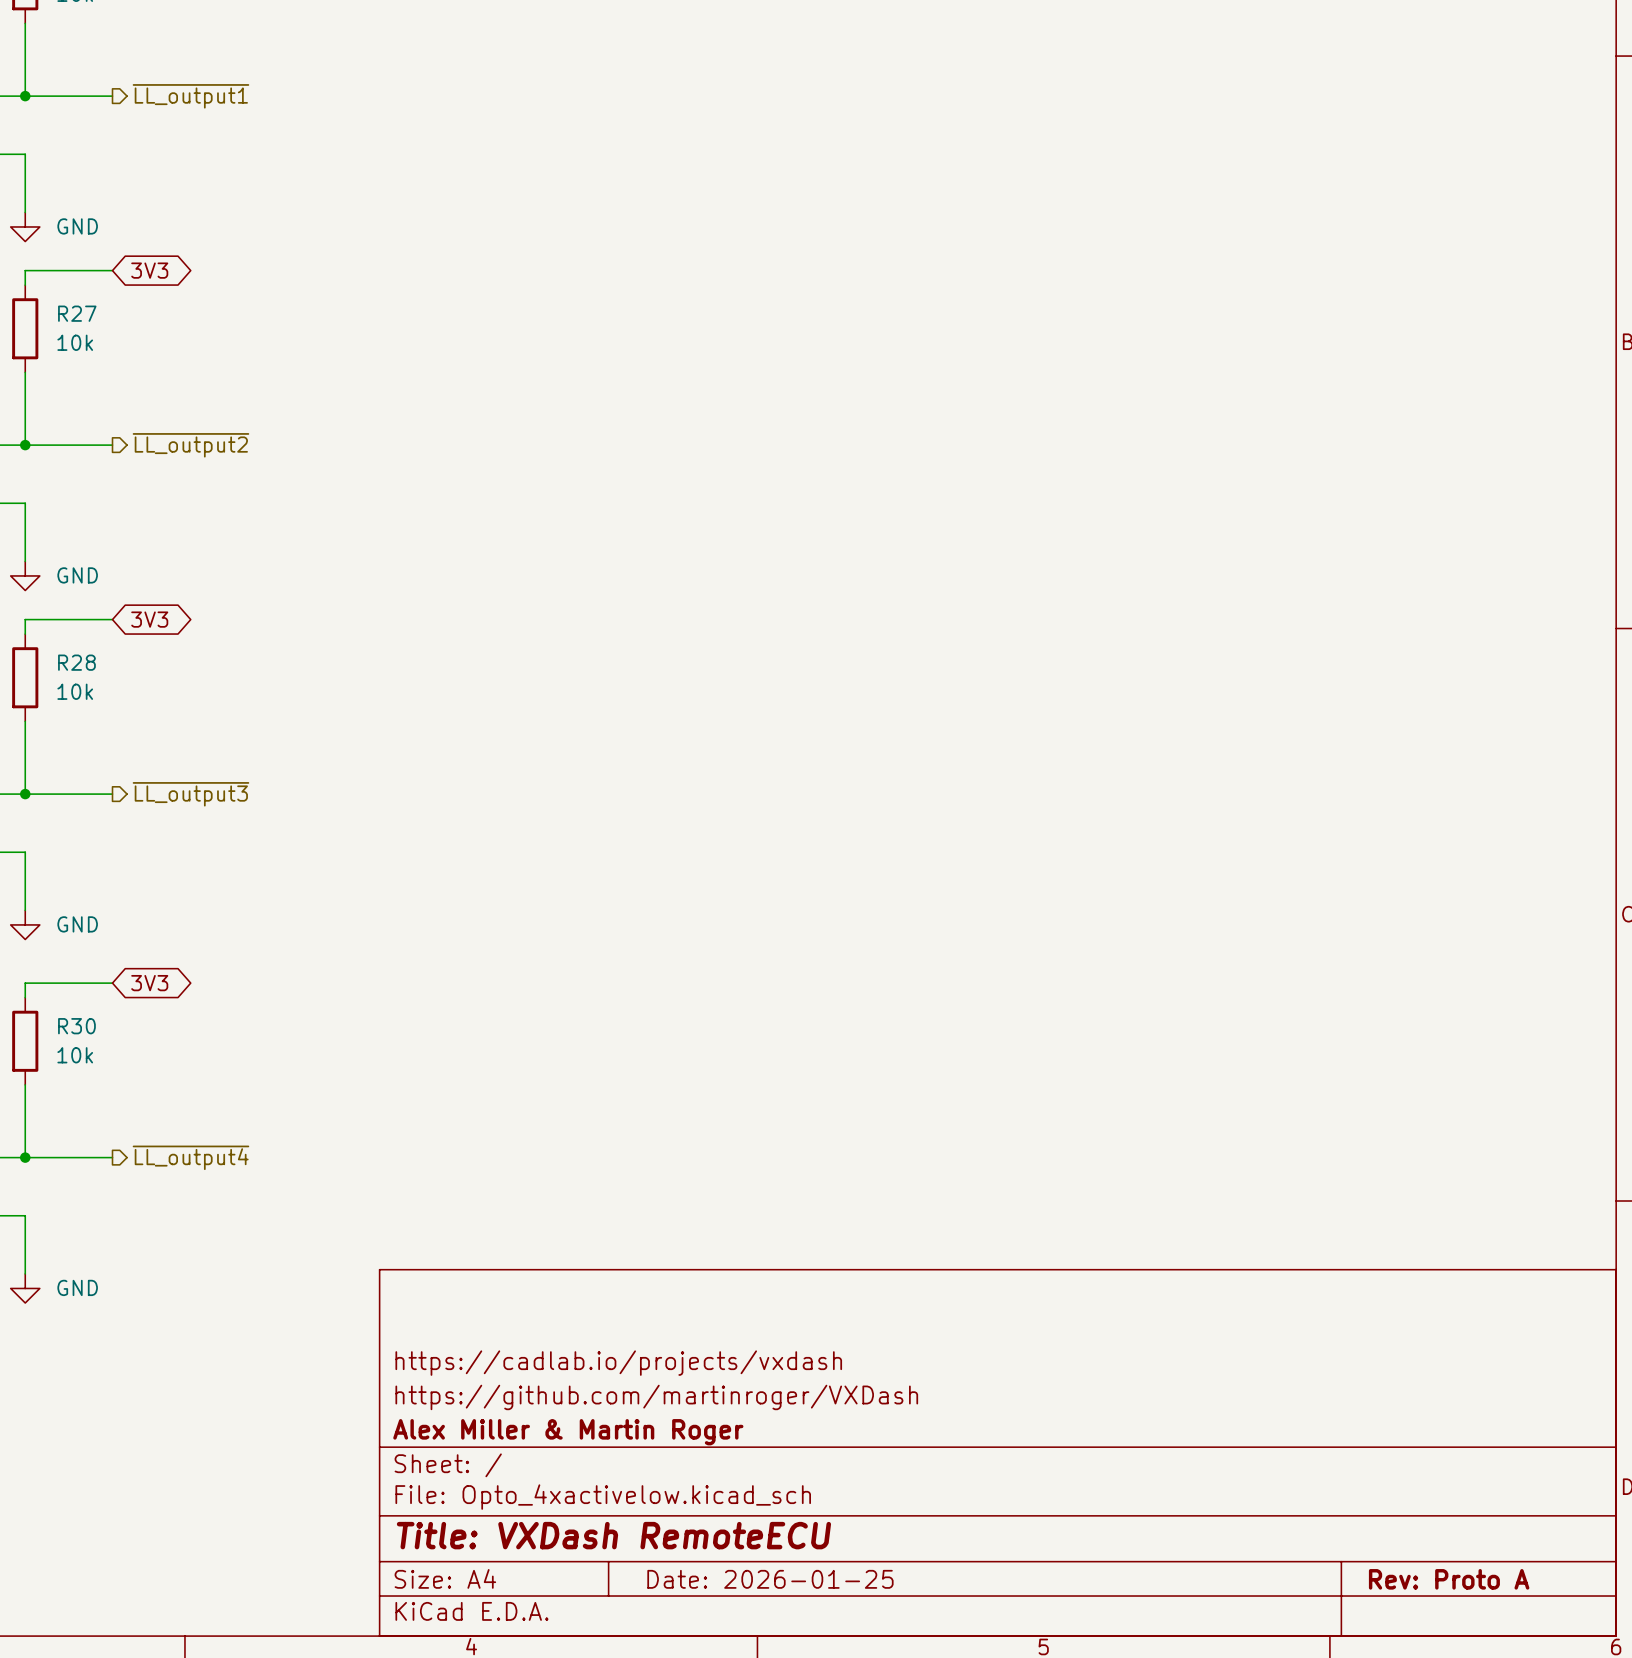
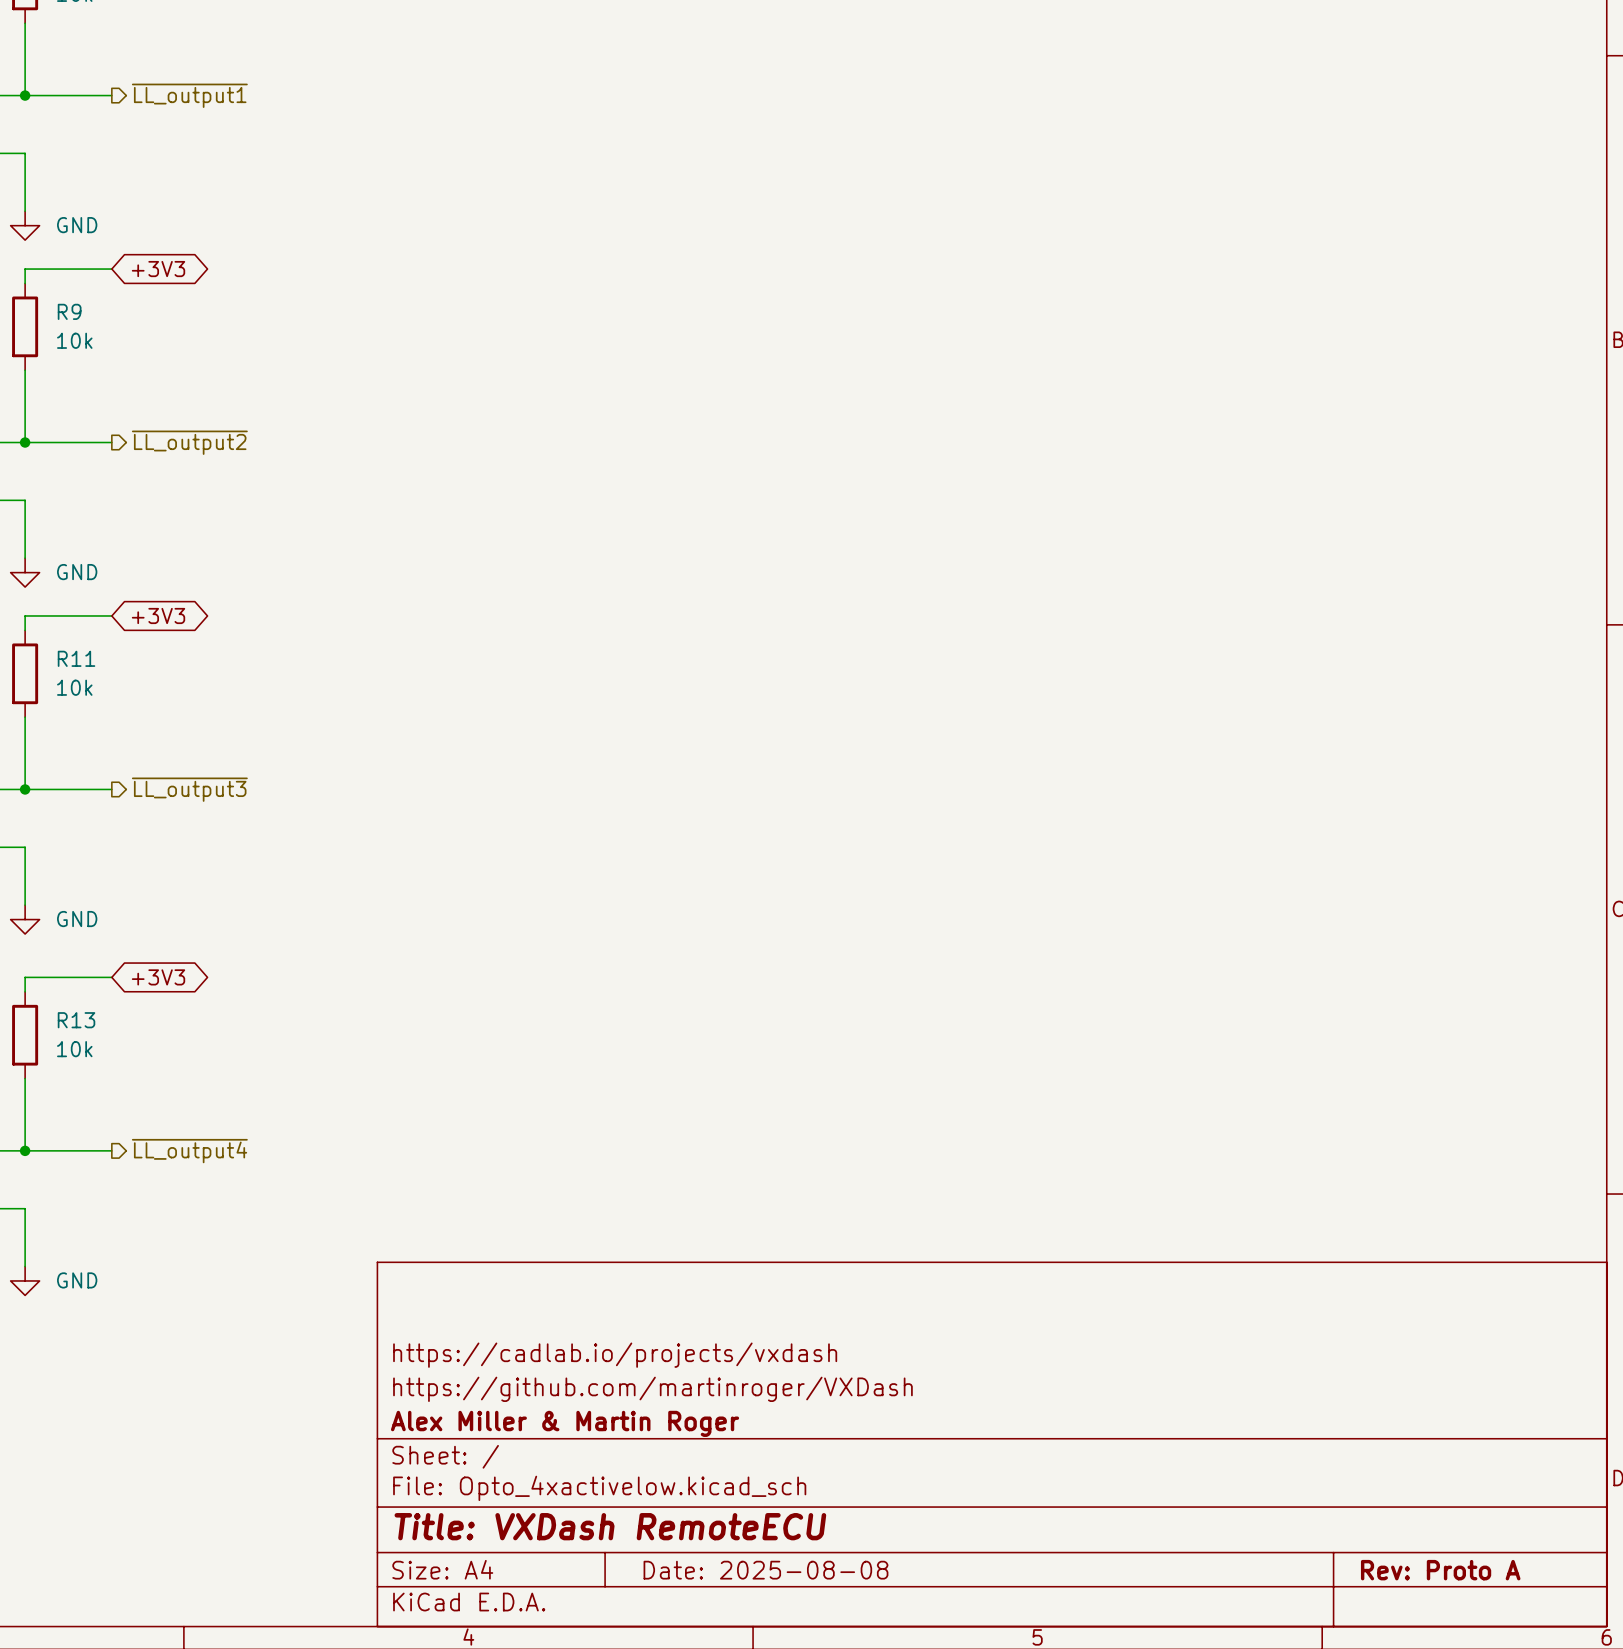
global label: 3V3 (149, 270) -> +3V3 (158, 269)
R27 name: R27 (77, 313) -> R9 (69, 311)
global label: 3V3 (149, 619) -> +3V3 (158, 615)
R28 name: R28 (76, 662) -> R11 (76, 658)
global label: 3V3 (149, 983) -> +3V3 (158, 977)
R30 name: R30 (76, 1026) -> R13 (76, 1020)
title block: Date: 2026-01-25 (770, 1579) -> Date: 2025-08-08 (765, 1570)

